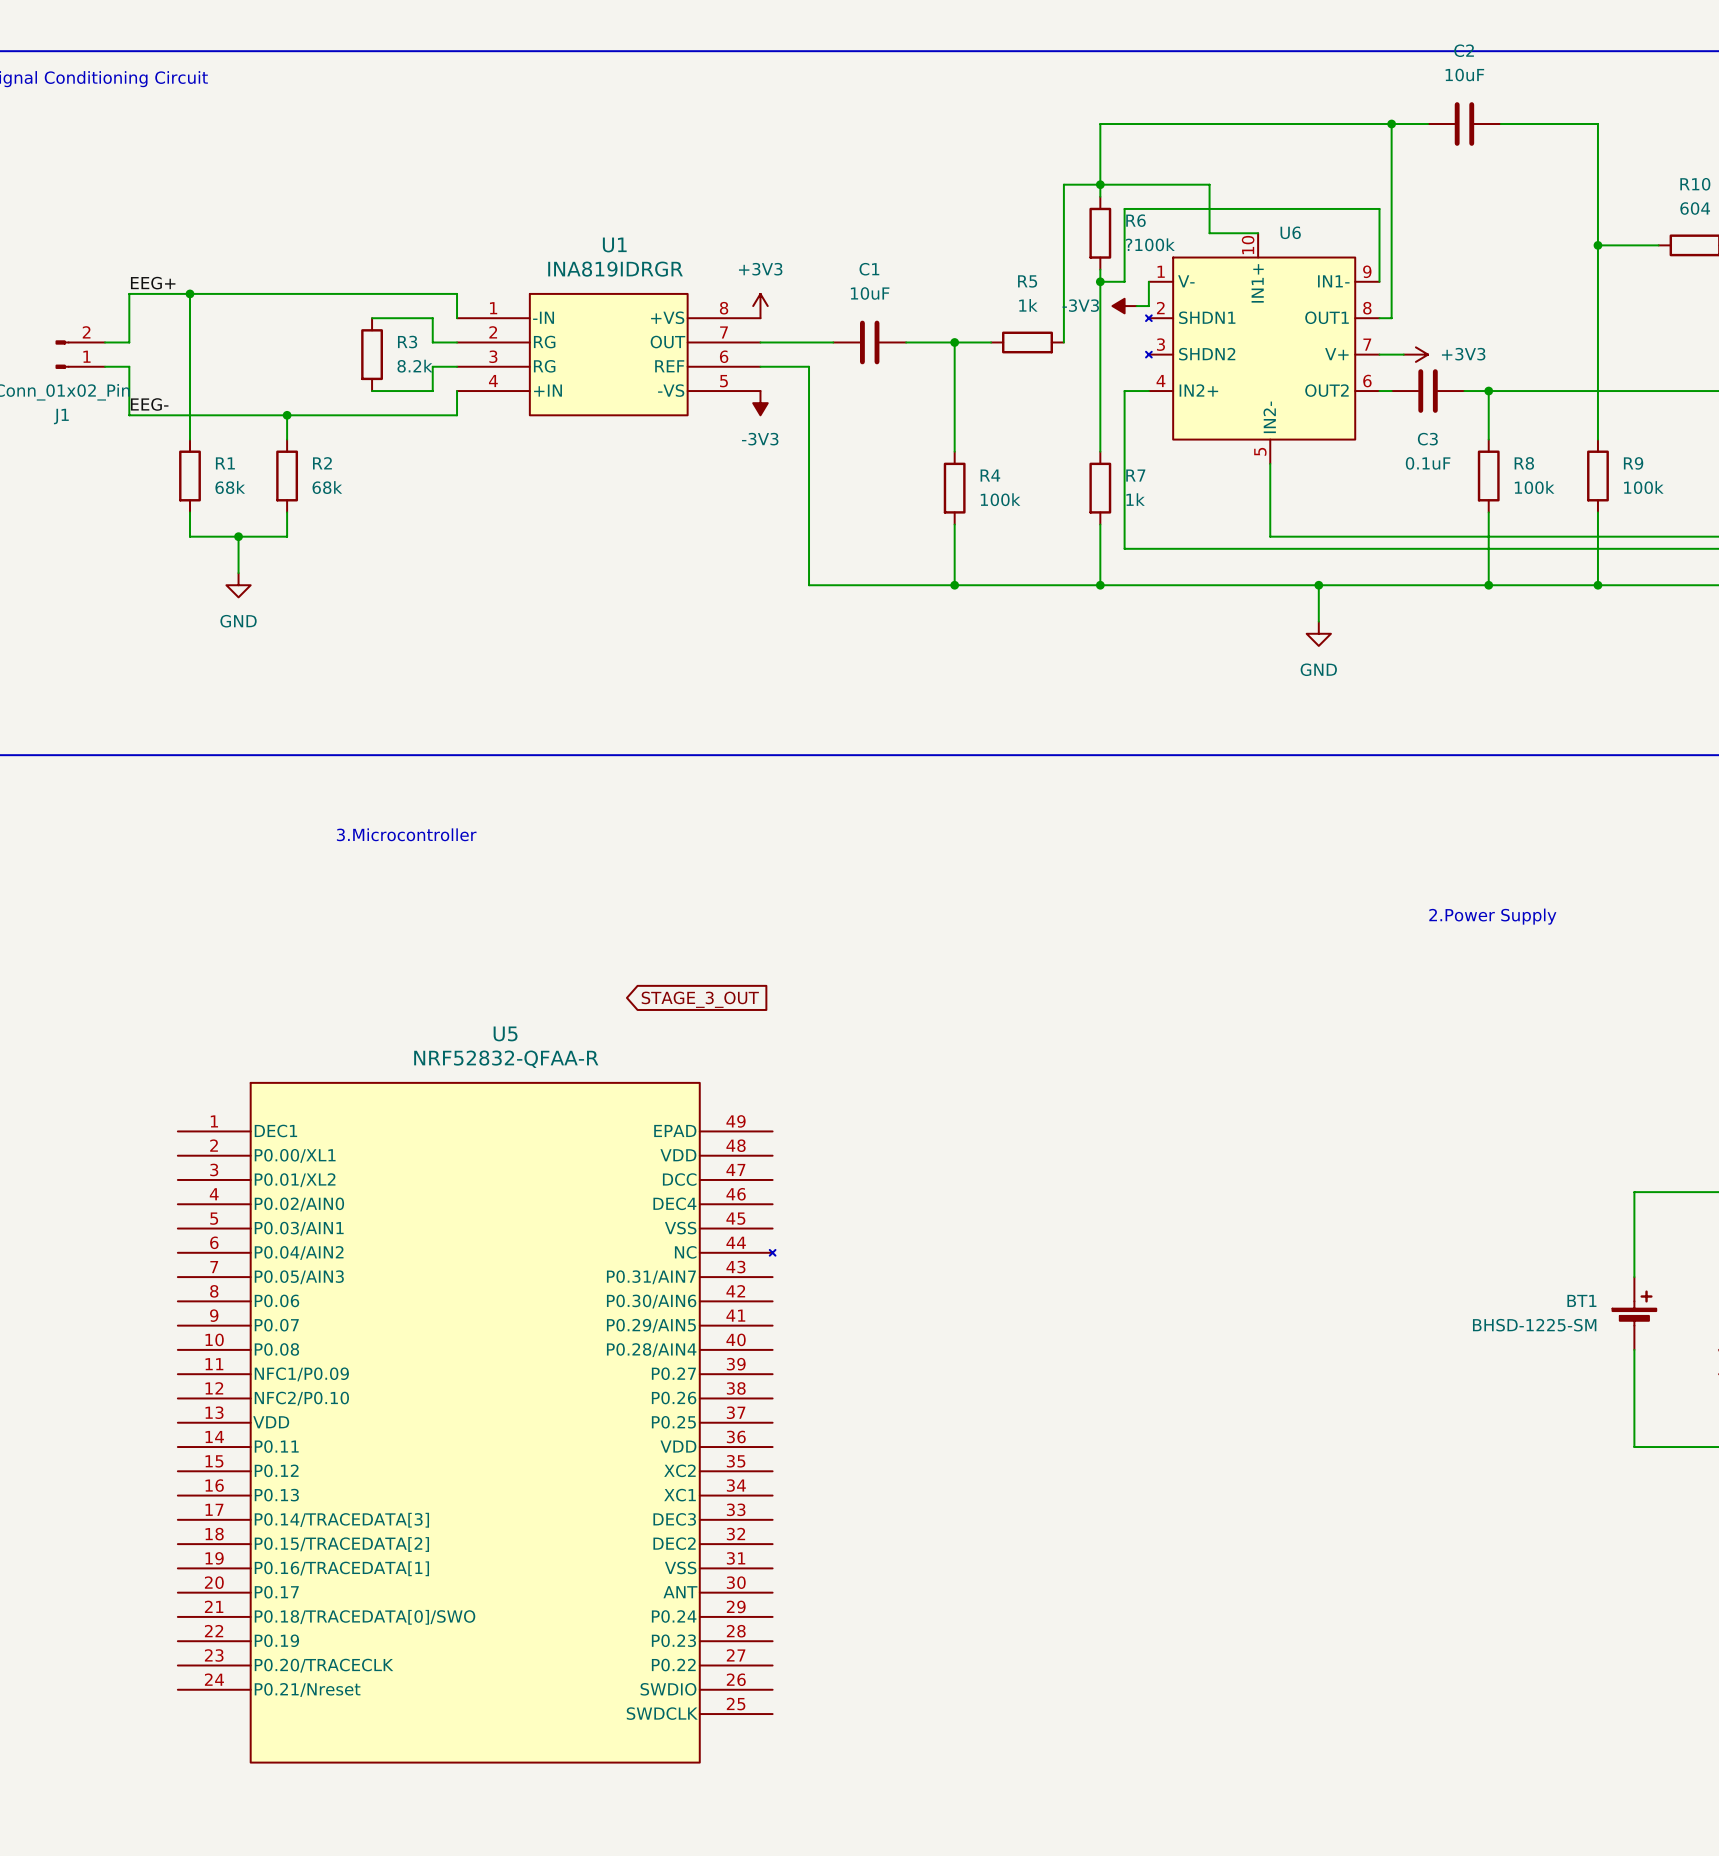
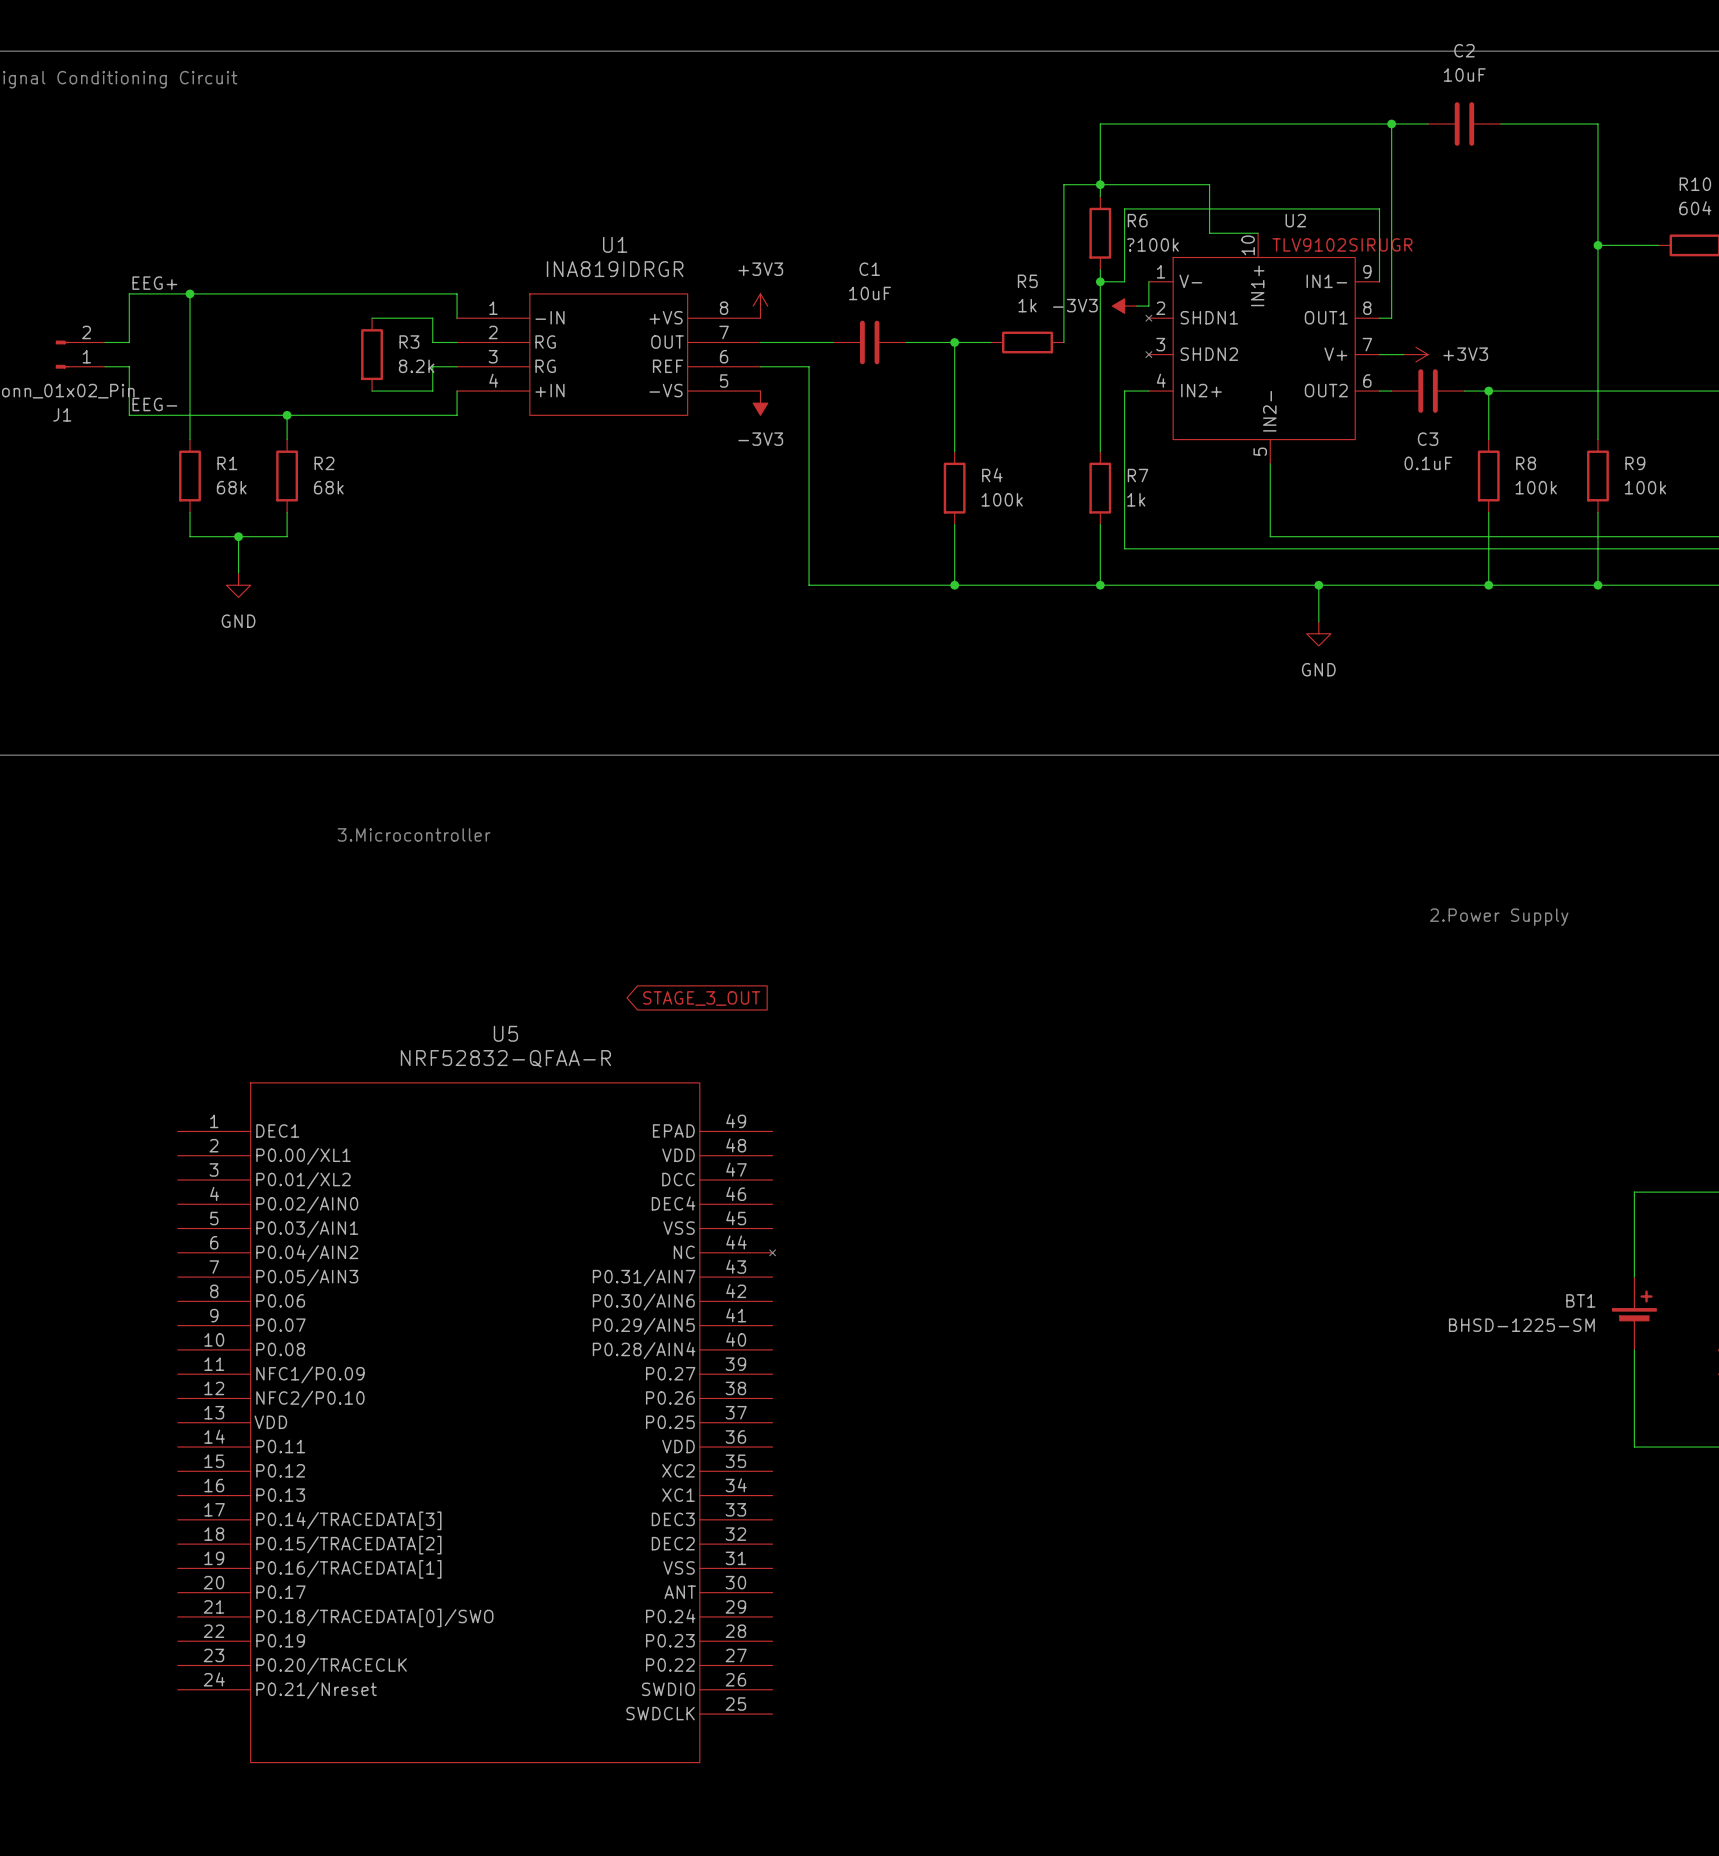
U6 name: U6 (1290, 232) -> U2 (1295, 220)
U6 text: none -> TLV9102SIRUGR (1342, 244)

